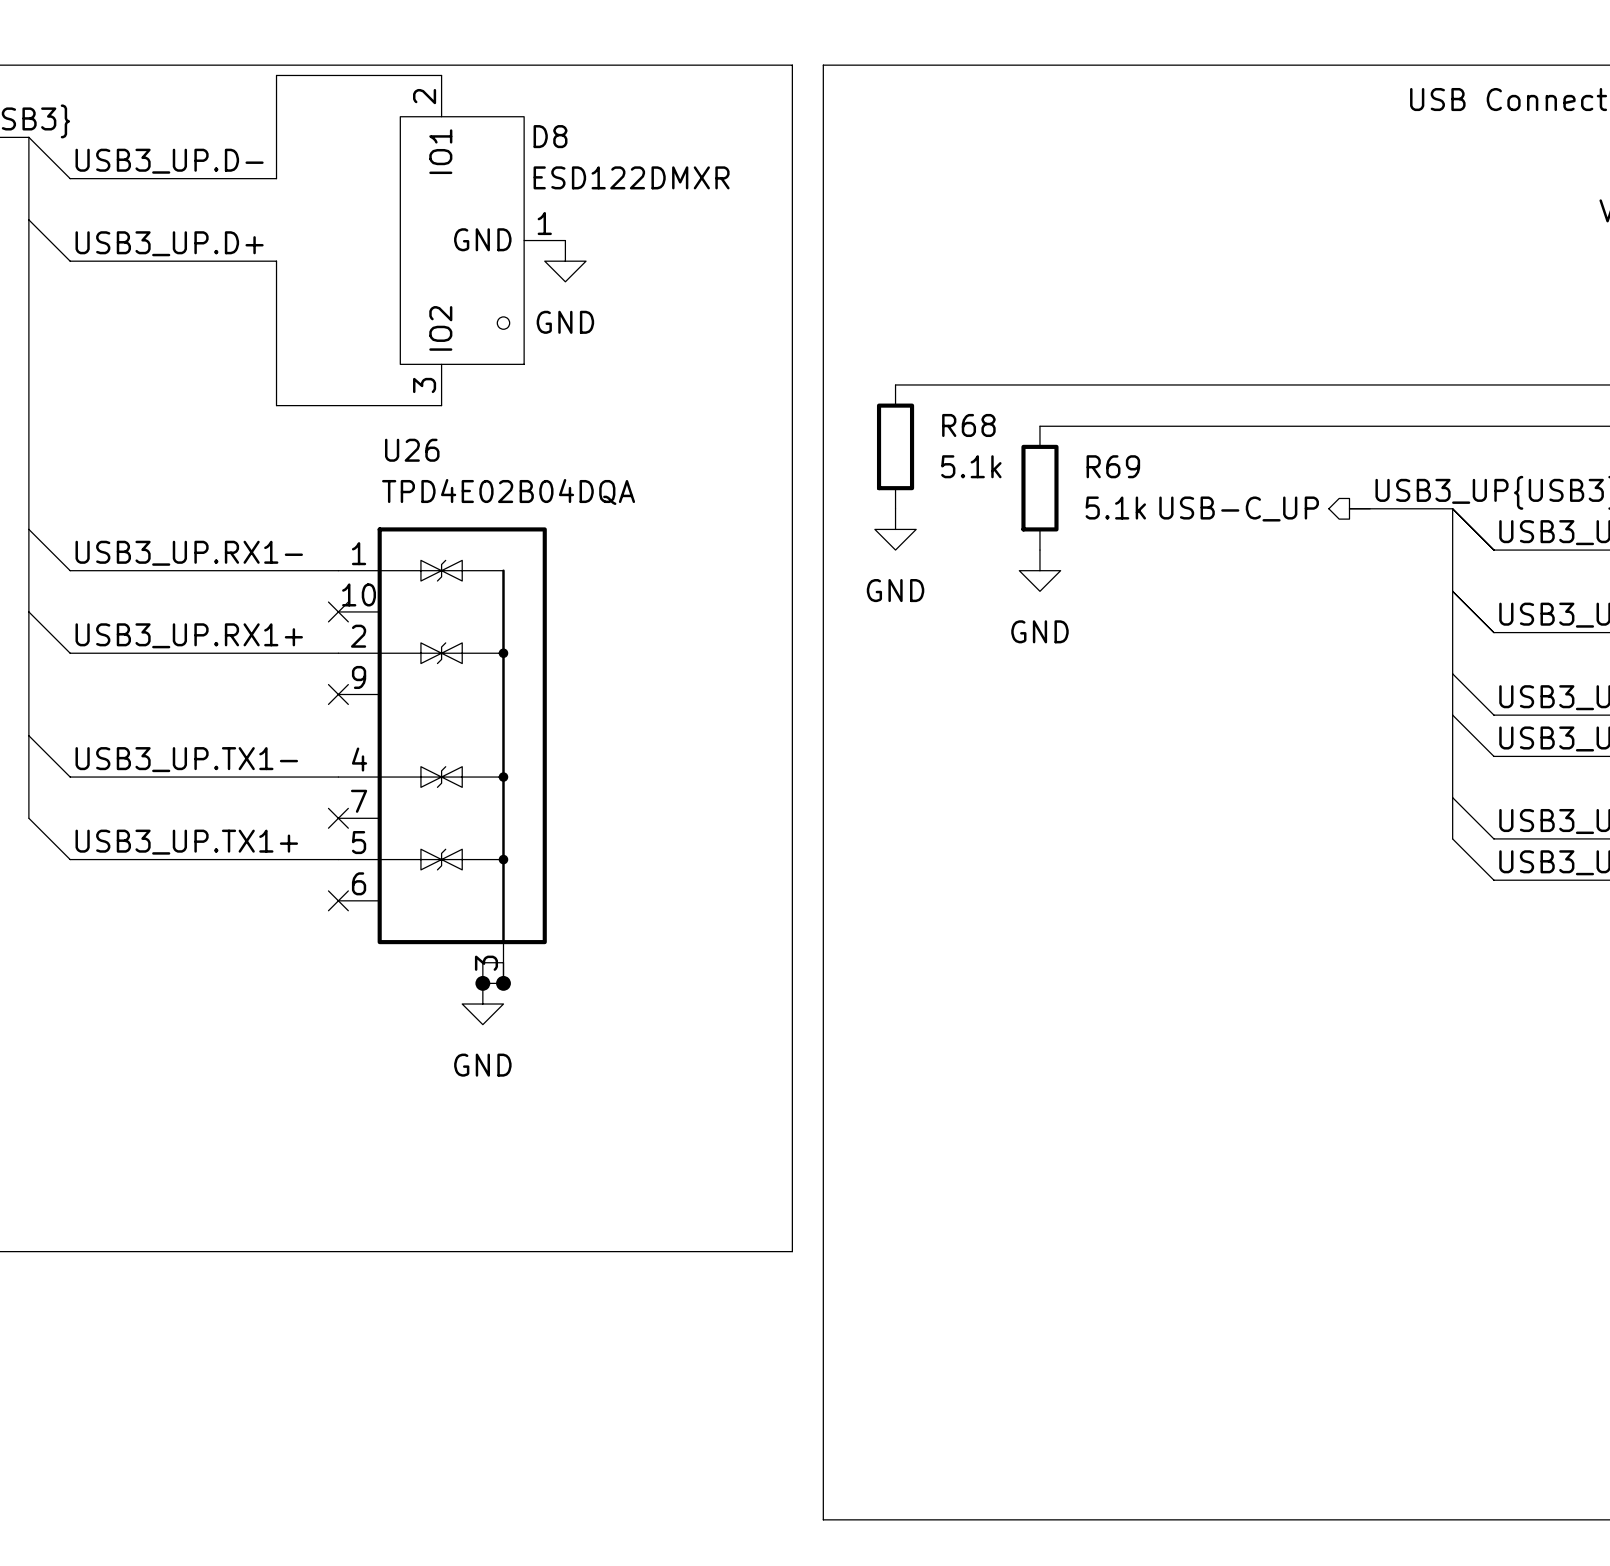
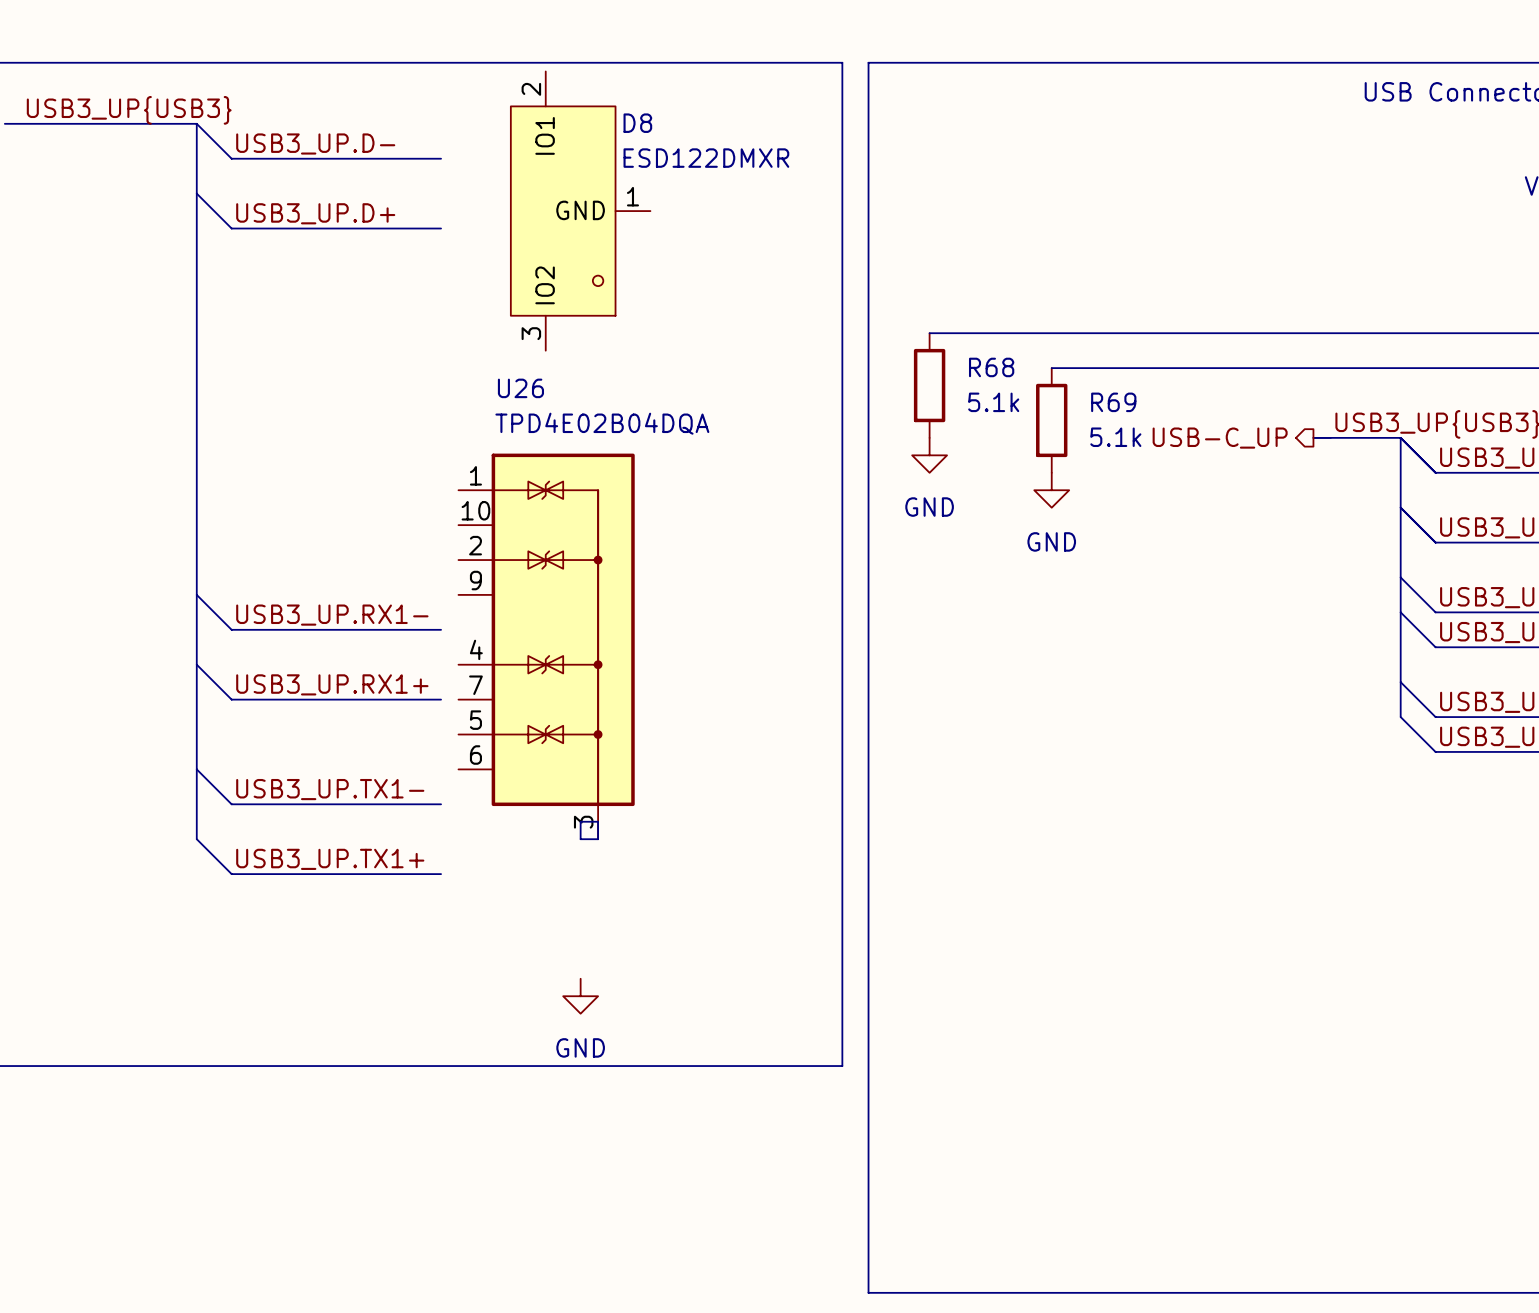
wire: (441, 75) (276, 75) (276, 178) -> (441, 158) (406, 158)
wire: (276, 261) (276, 405) (441, 405) -> (406, 228) (441, 228)
power symbol: GND (565, 261) -> none
wire: (28, 529) (70, 570) (338, 570) -> none
label position: USB3_UP.RX1- (189, 553) -> USB3_UP.RX1- (332, 615)
wire: (28, 611) (70, 653) (338, 653) -> none
no-connect mark: (338, 611) -> none
label position: USB3_UP.RX1+ (189, 635) -> USB3_UP.RX1+ (332, 684)
wire: none -> (196, 594) (231, 629) (441, 629)
no-connect mark: (338, 694) -> none
wire: (28, 735) (70, 777) (338, 777) -> none
label position: USB3_UP.TX1- (186, 759) -> USB3_UP.TX1- (330, 789)
wire: none -> (196, 664) (231, 699) (441, 699)
wire: (28, 818) (70, 859) (338, 859) -> none
bus: none -> (196, 699) (196, 839)
no-connect mark: (338, 818) -> none
label position: USB3_UP.TX1+ (186, 842) -> USB3_UP.TX1+ (330, 859)
wire: none -> (196, 769) (231, 804) (441, 804)
no-connect mark: (338, 900) -> none
wire: none -> (196, 839) (231, 874) (441, 874)
junction: (482, 983) -> none
junction: (503, 983) -> none
power symbol position: GND (482, 1004) -> GND (580, 996)

